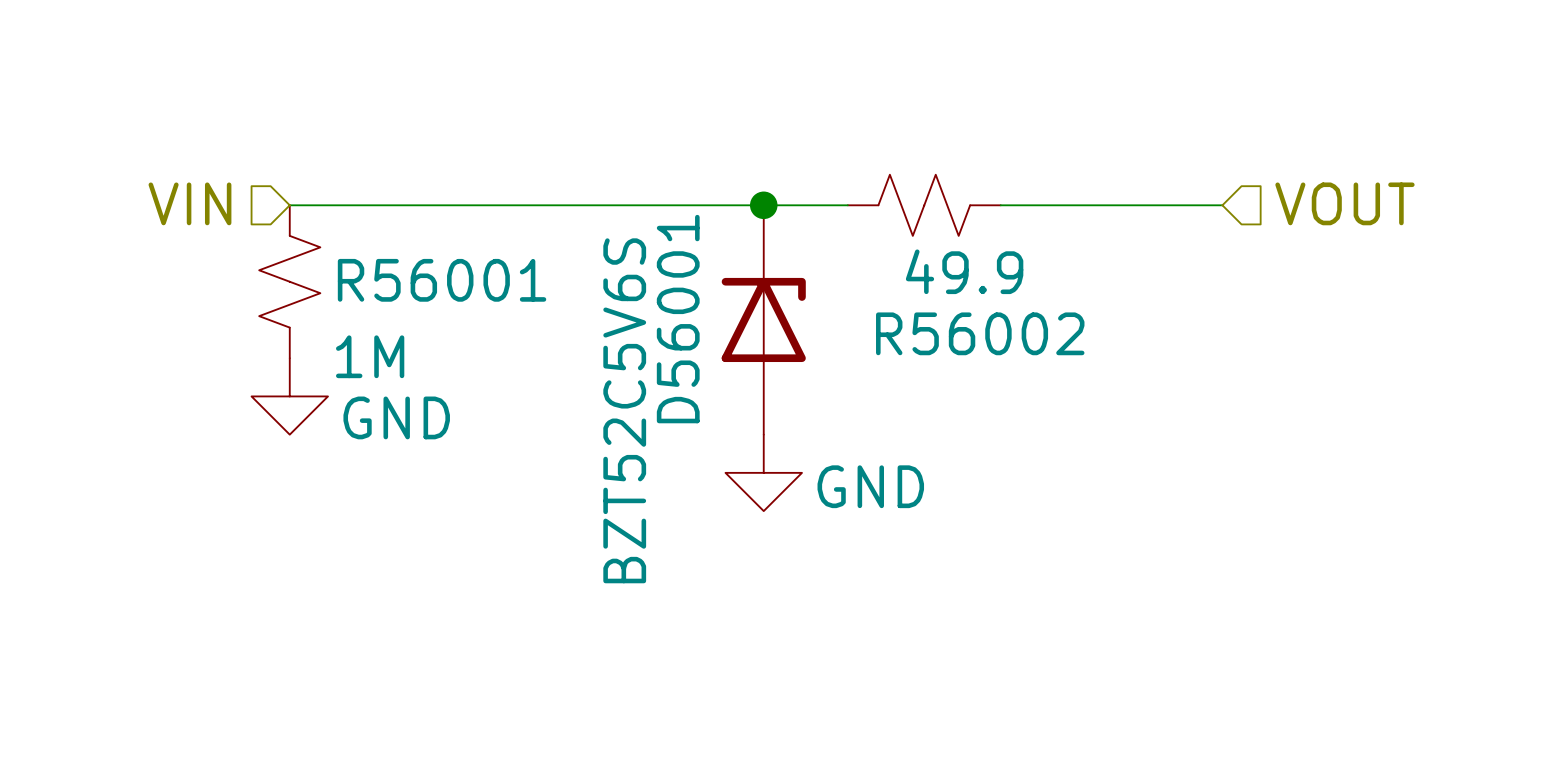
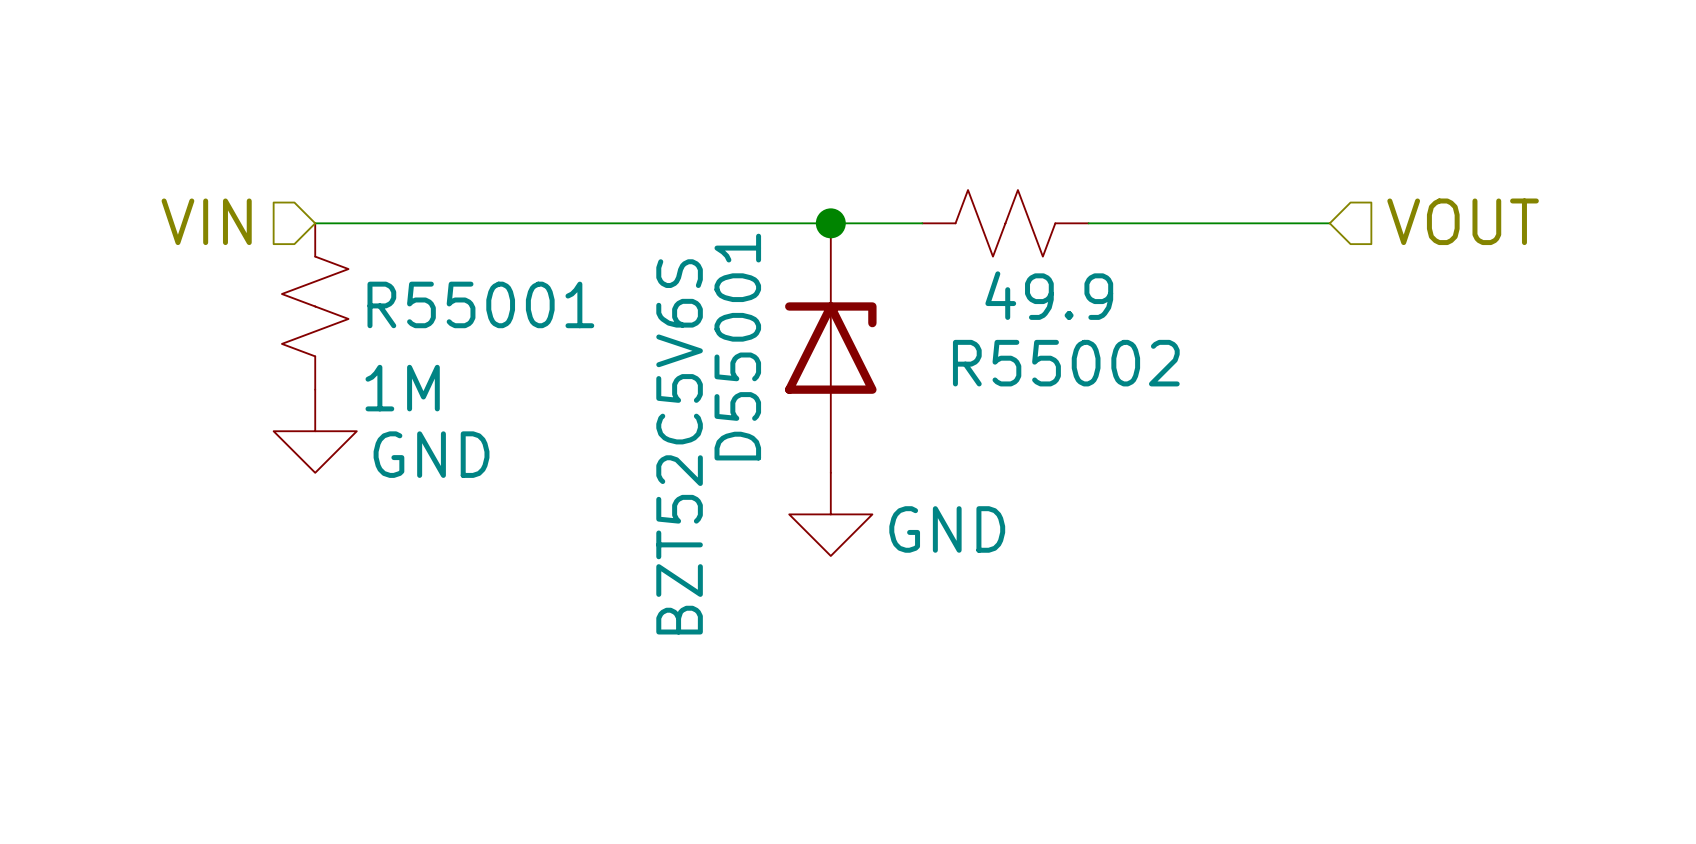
R56001 name: R56001 (442, 280) -> R55001 (480, 304)
D56001 name: D56001 (678, 319) -> D55001 (737, 347)
R56002 name: R56002 (980, 333) -> R55002 (1066, 363)

